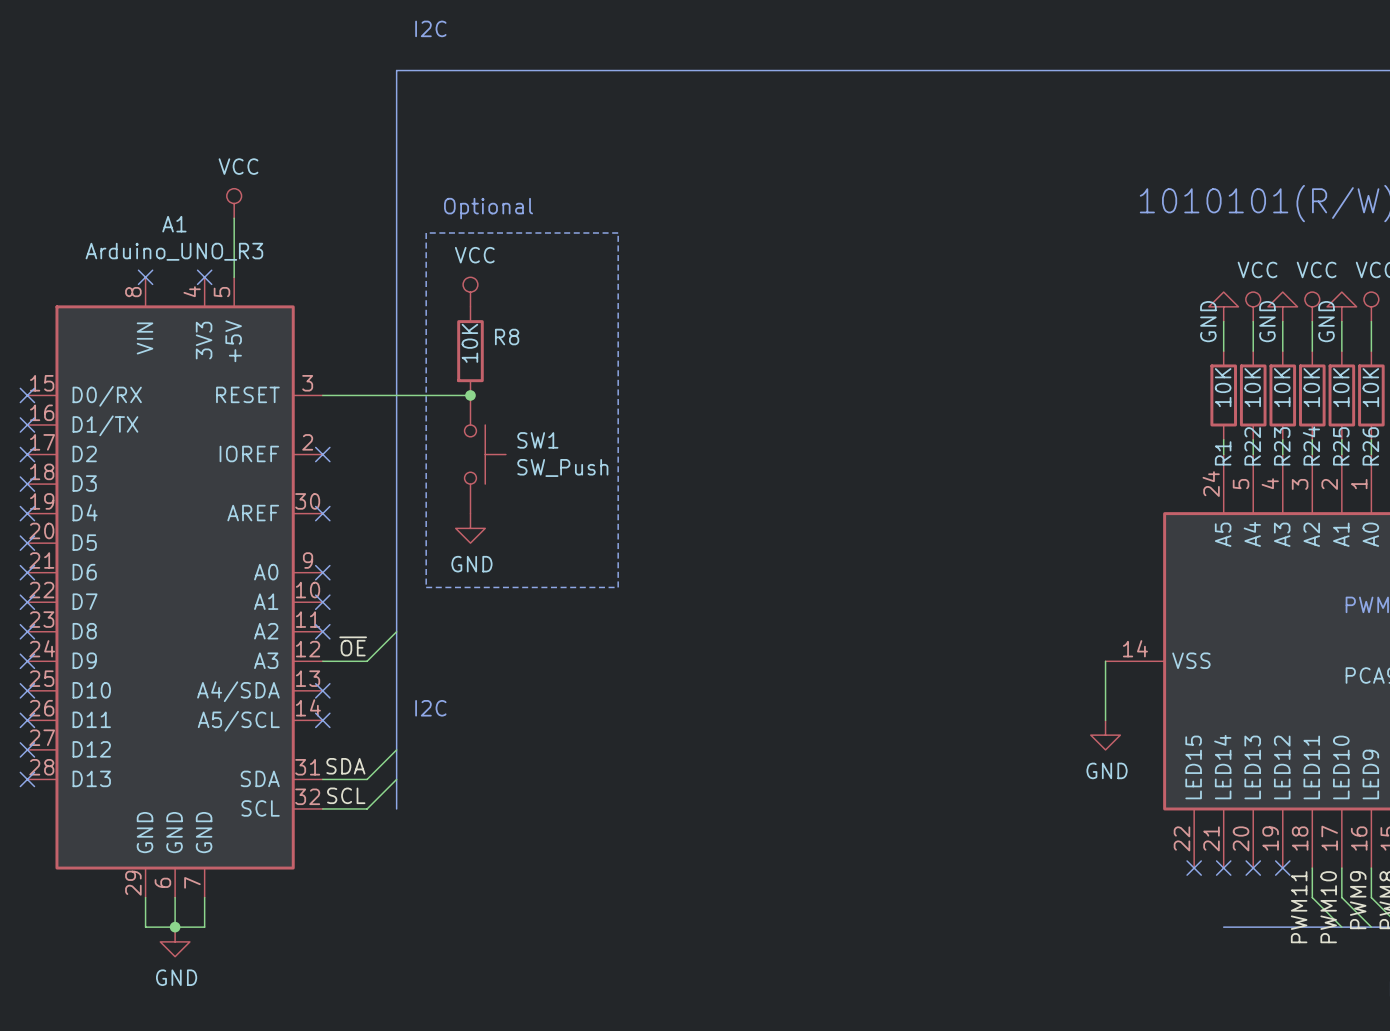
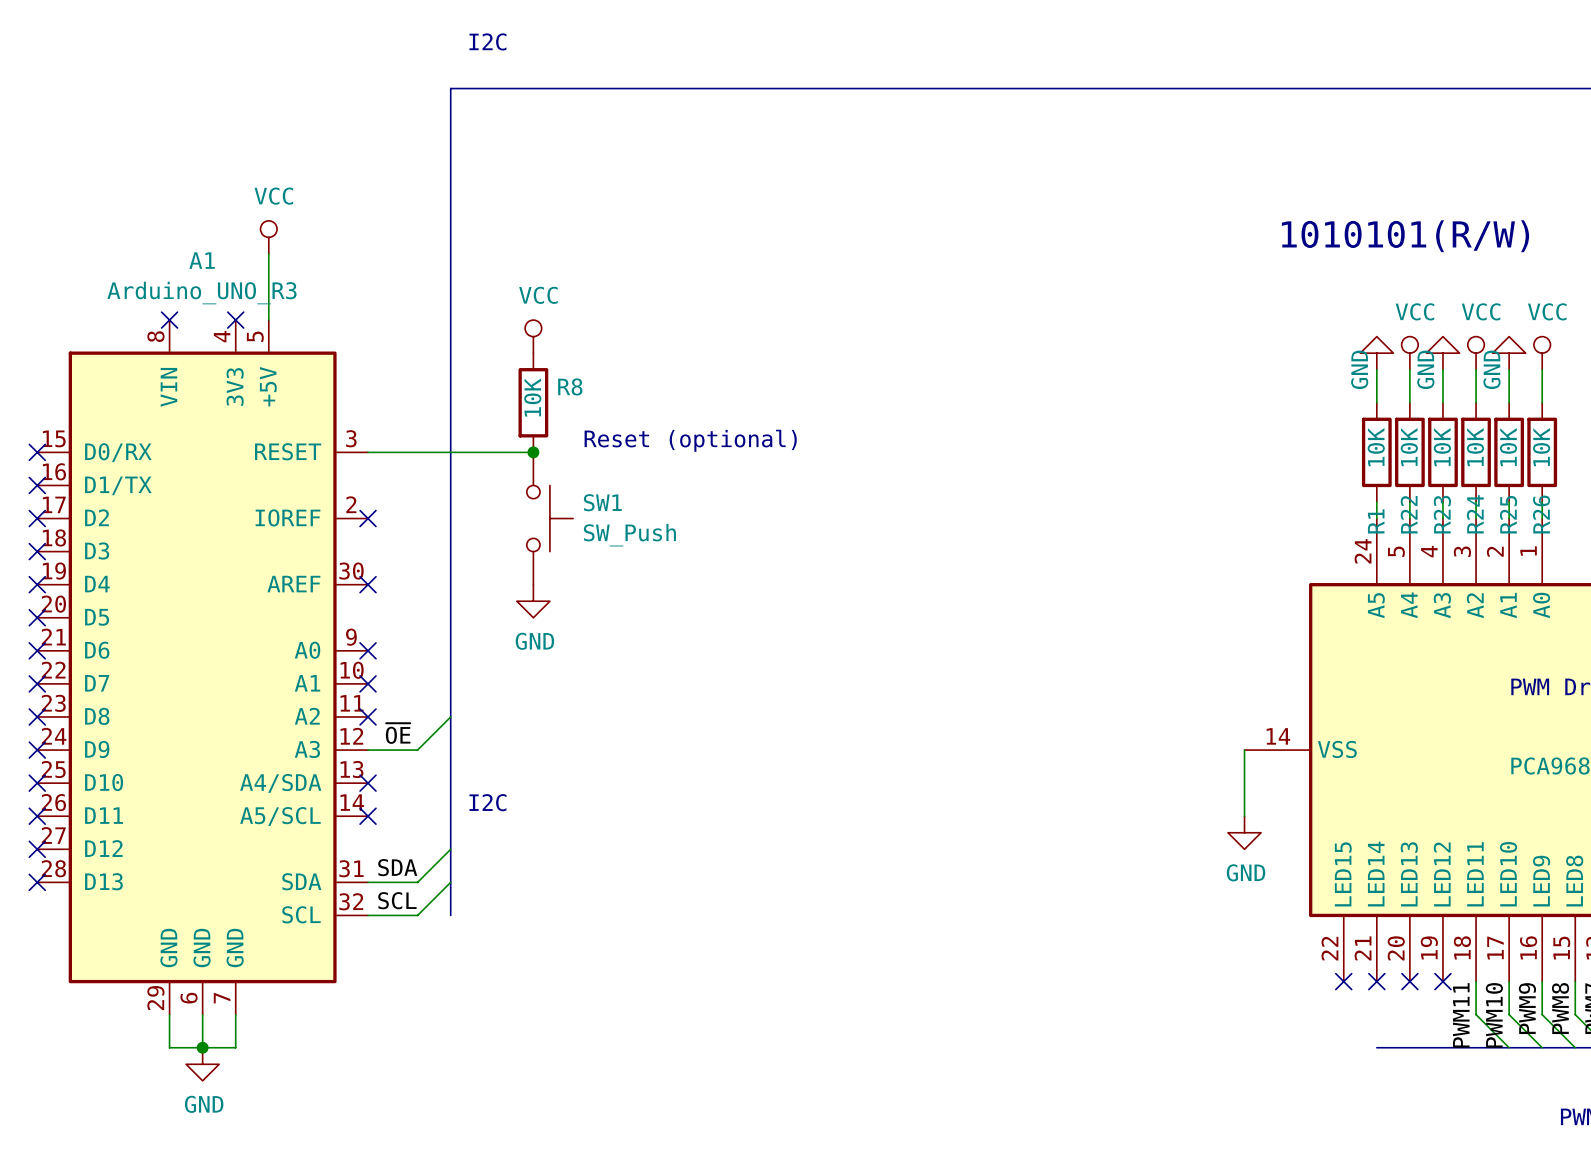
text: Optional (488, 208) -> none
line: (426, 233) (426, 587) (618, 587) (618, 233) (426, 233) -> none
text: none -> Reset (optional) (690, 440)

